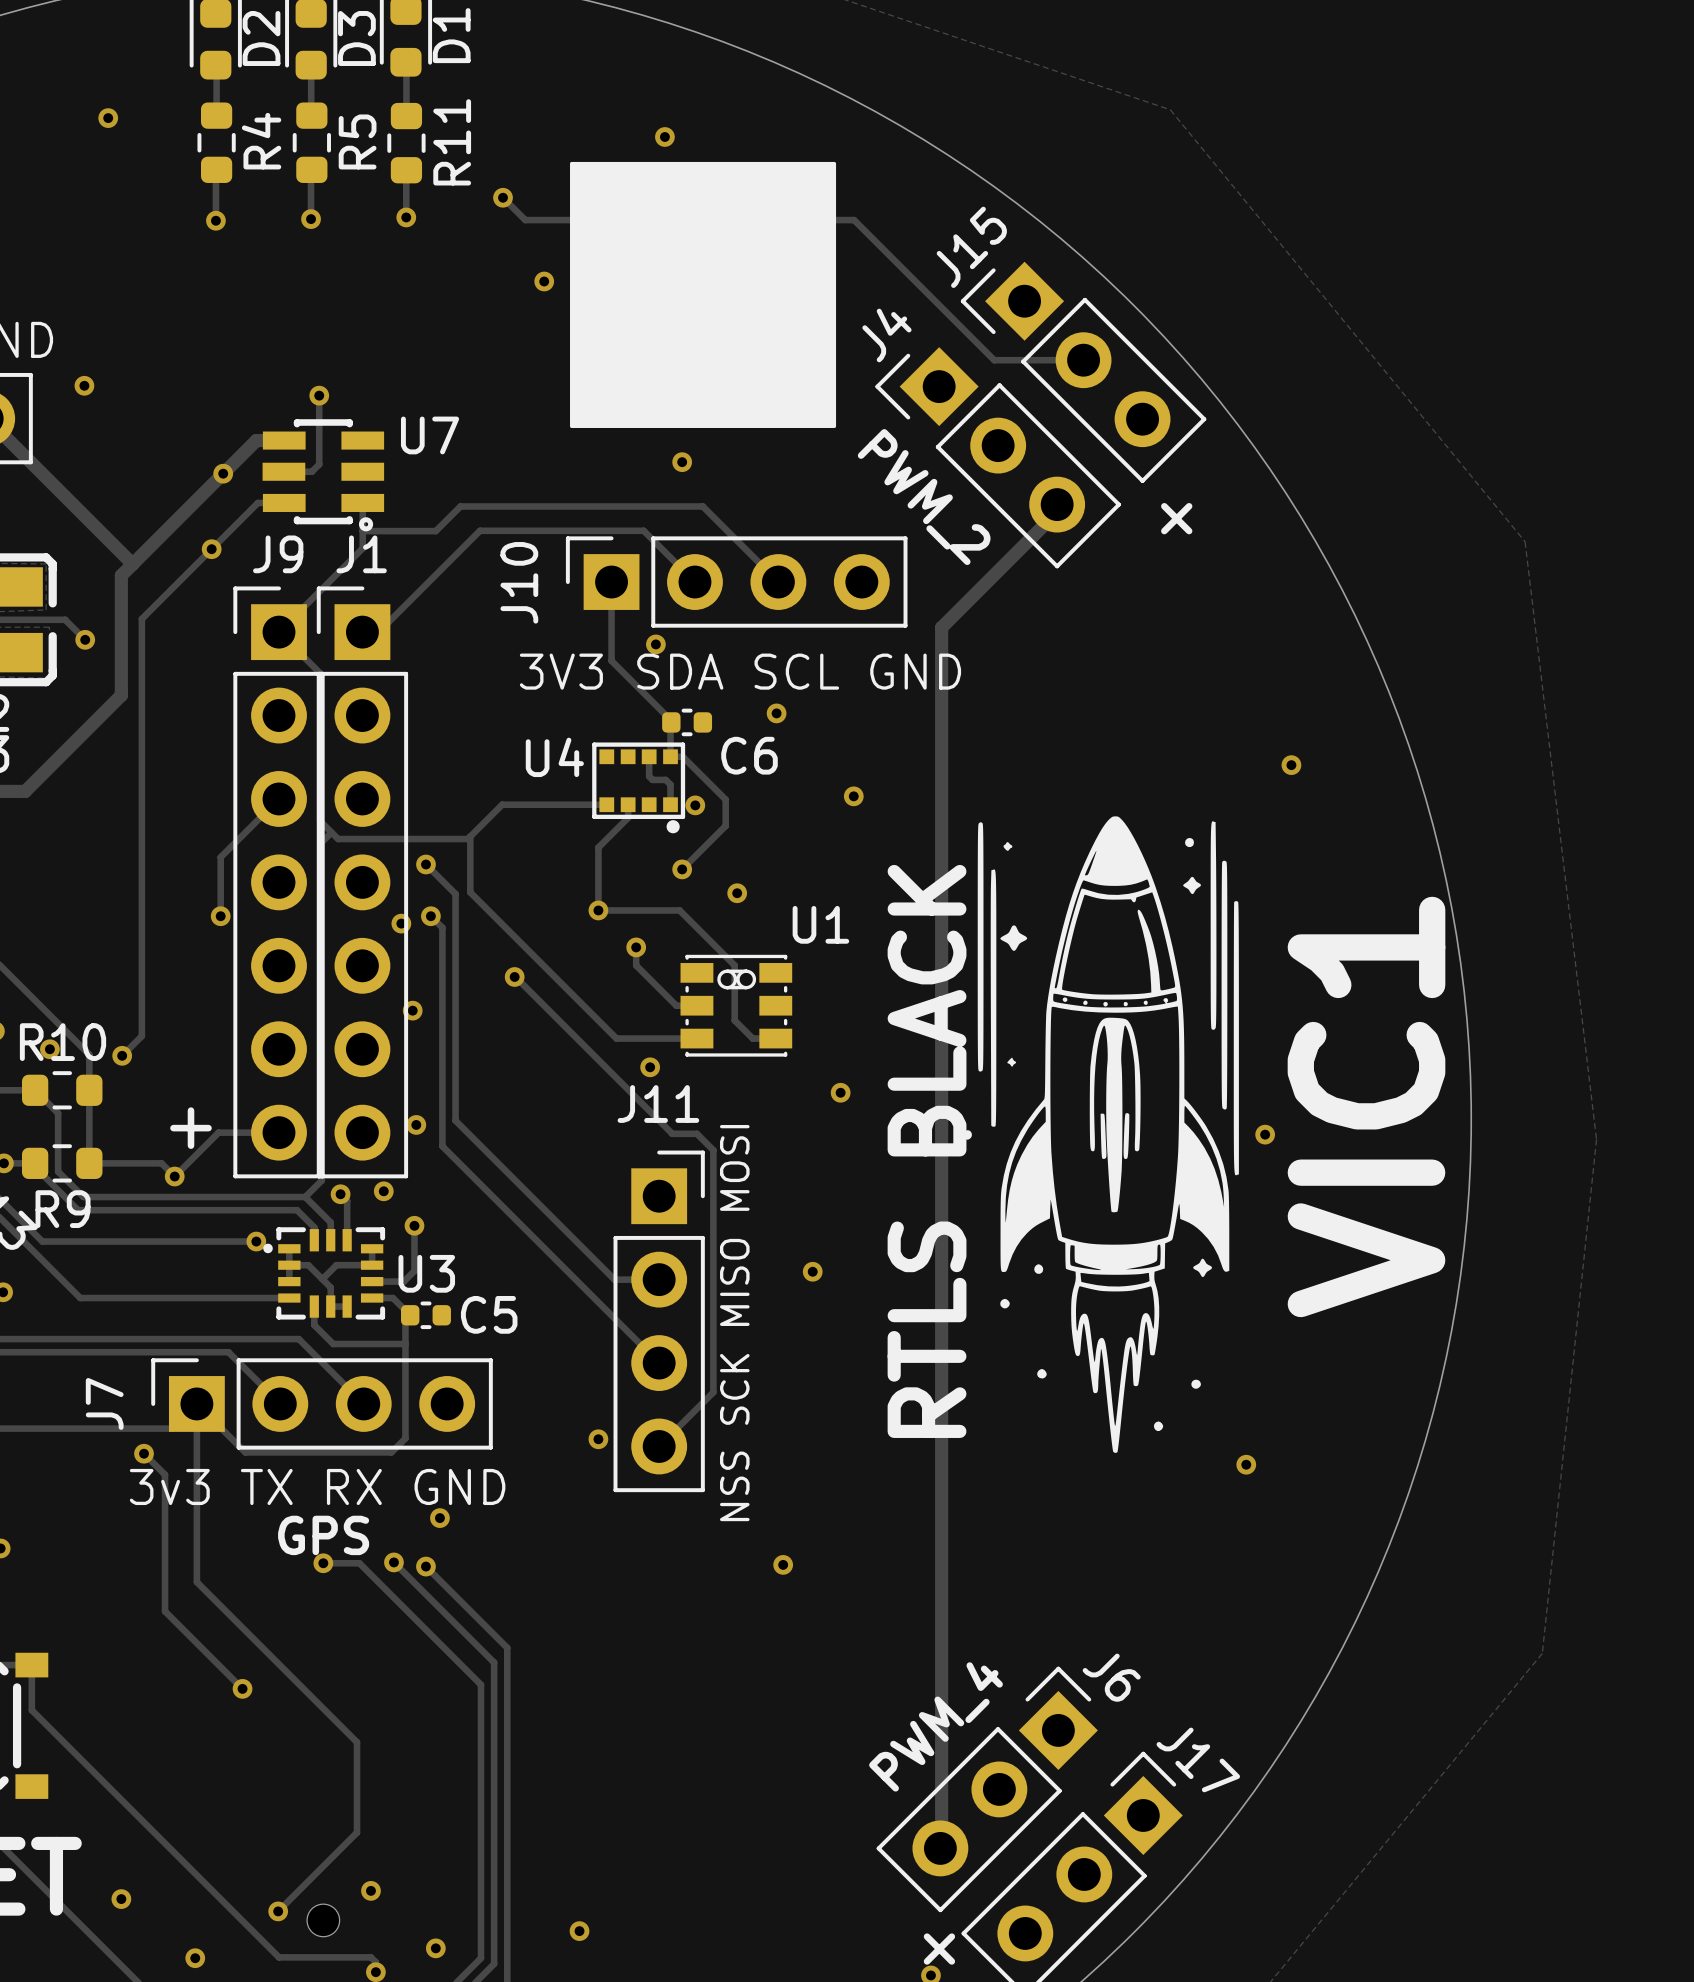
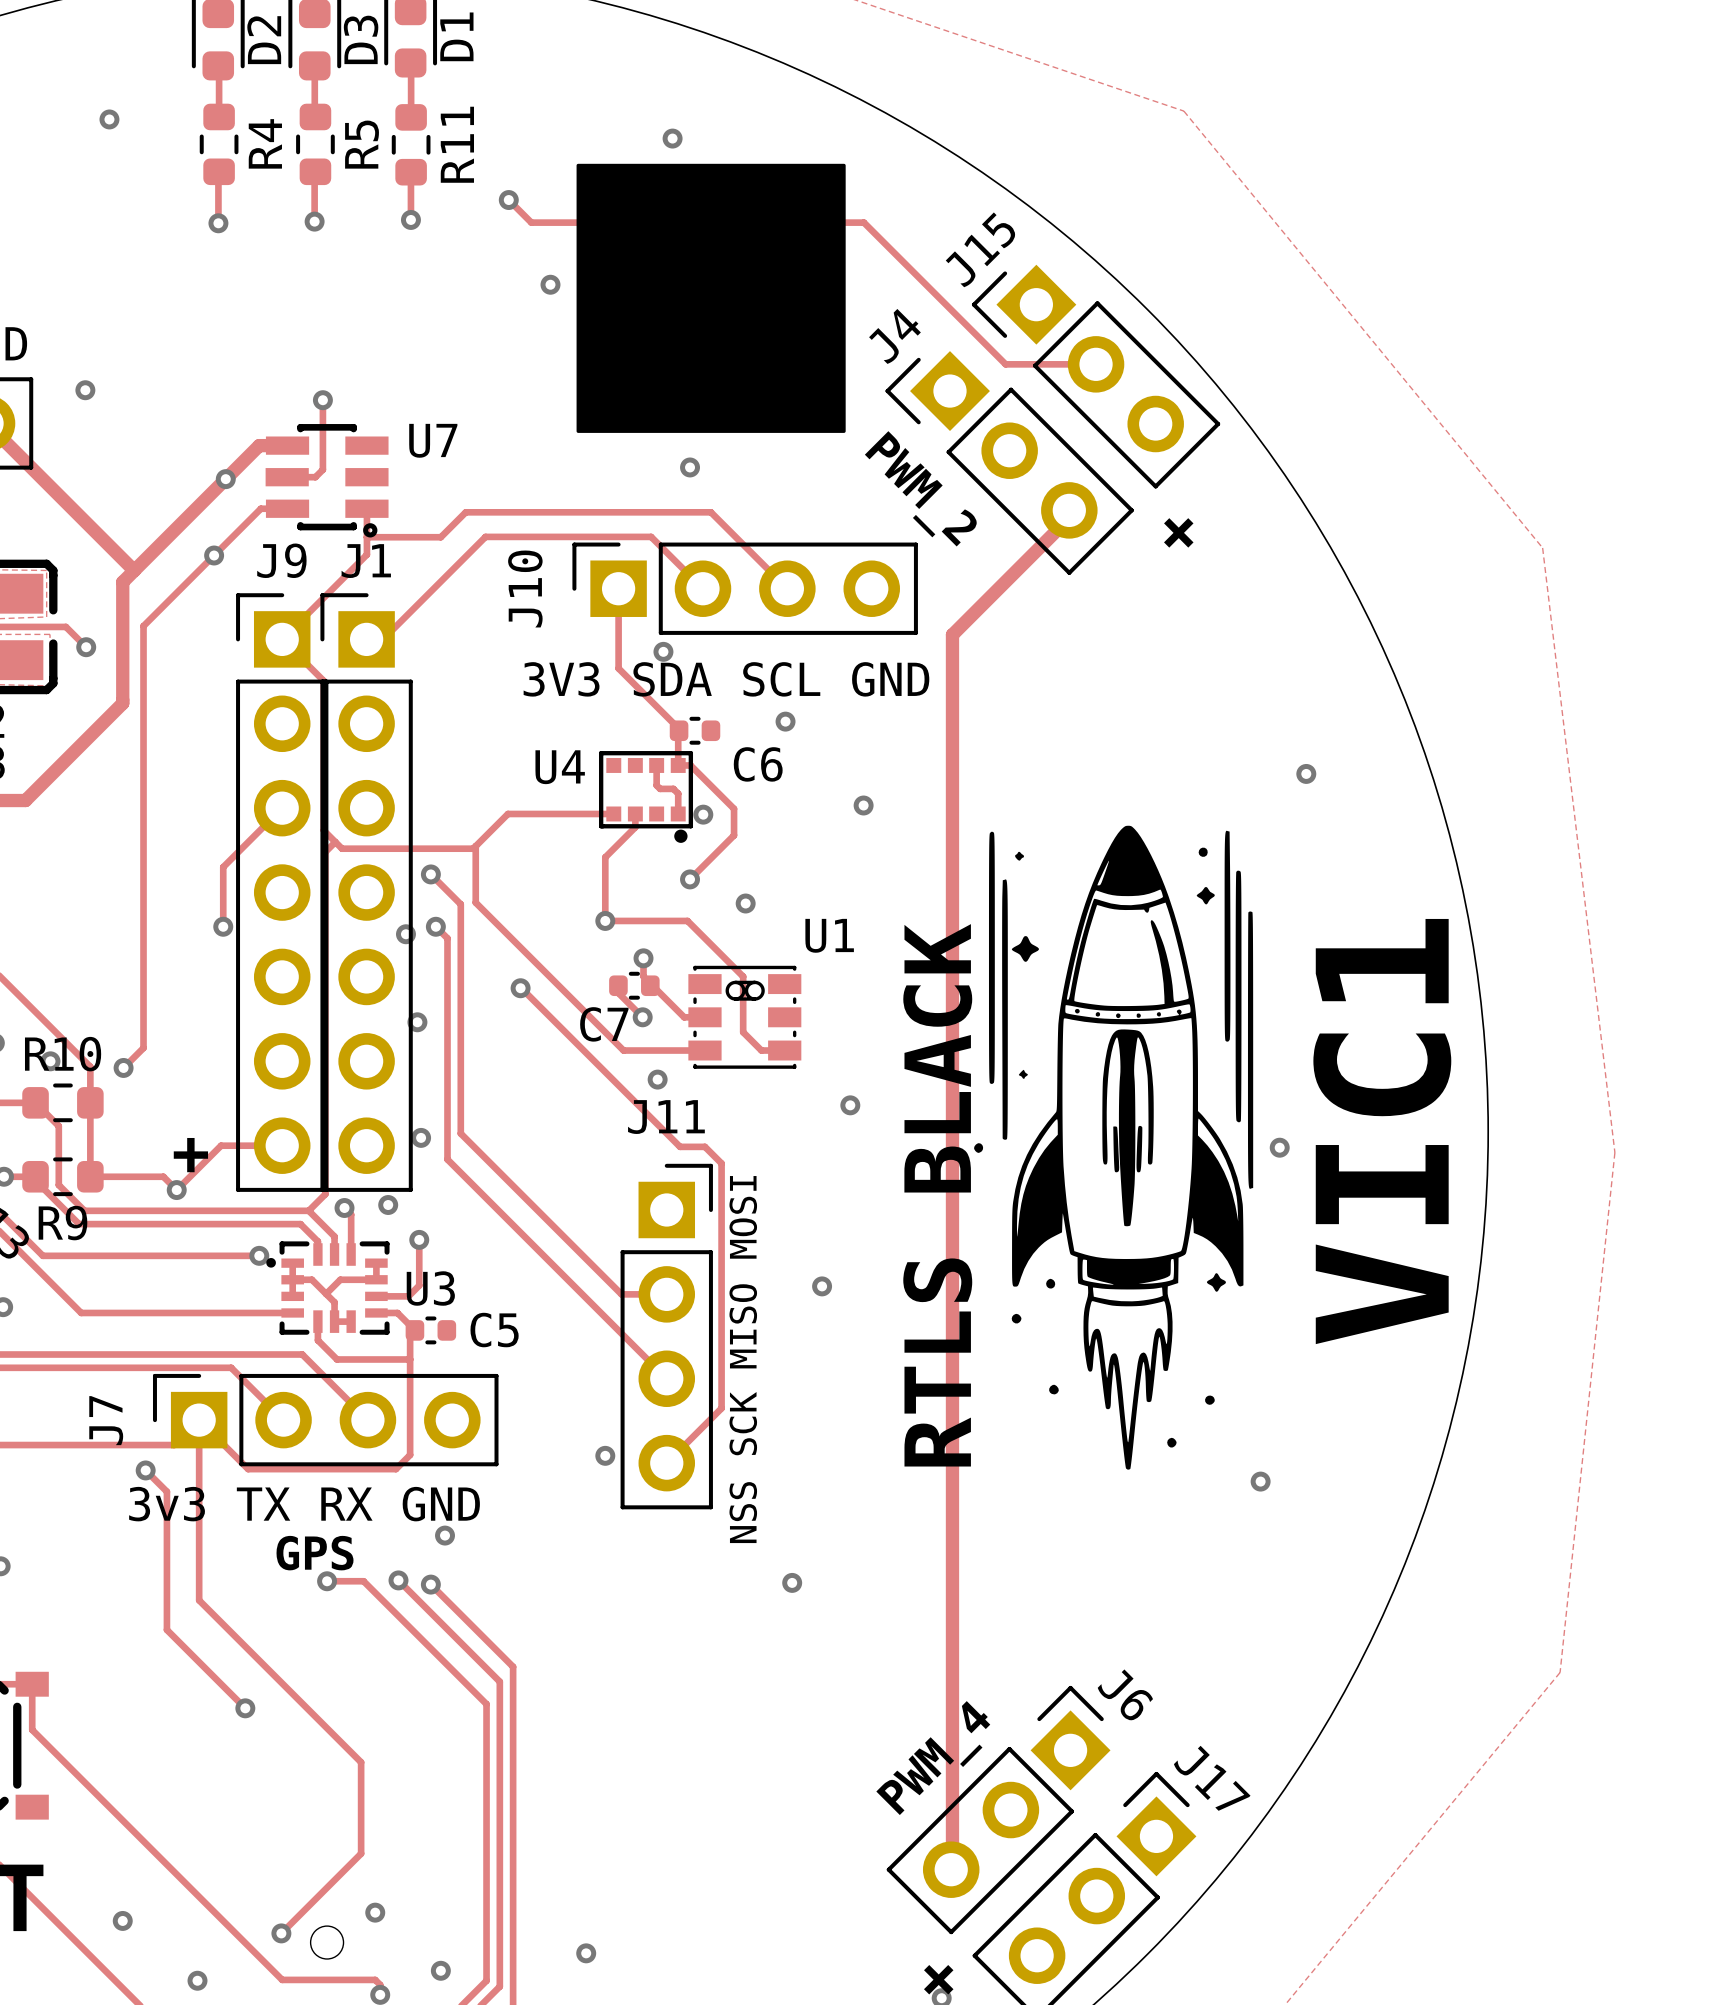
track: none -> (618, 985) (618, 993) (642, 1017)
C7: none -> (634, 985)
via: none -> (642, 1017)

